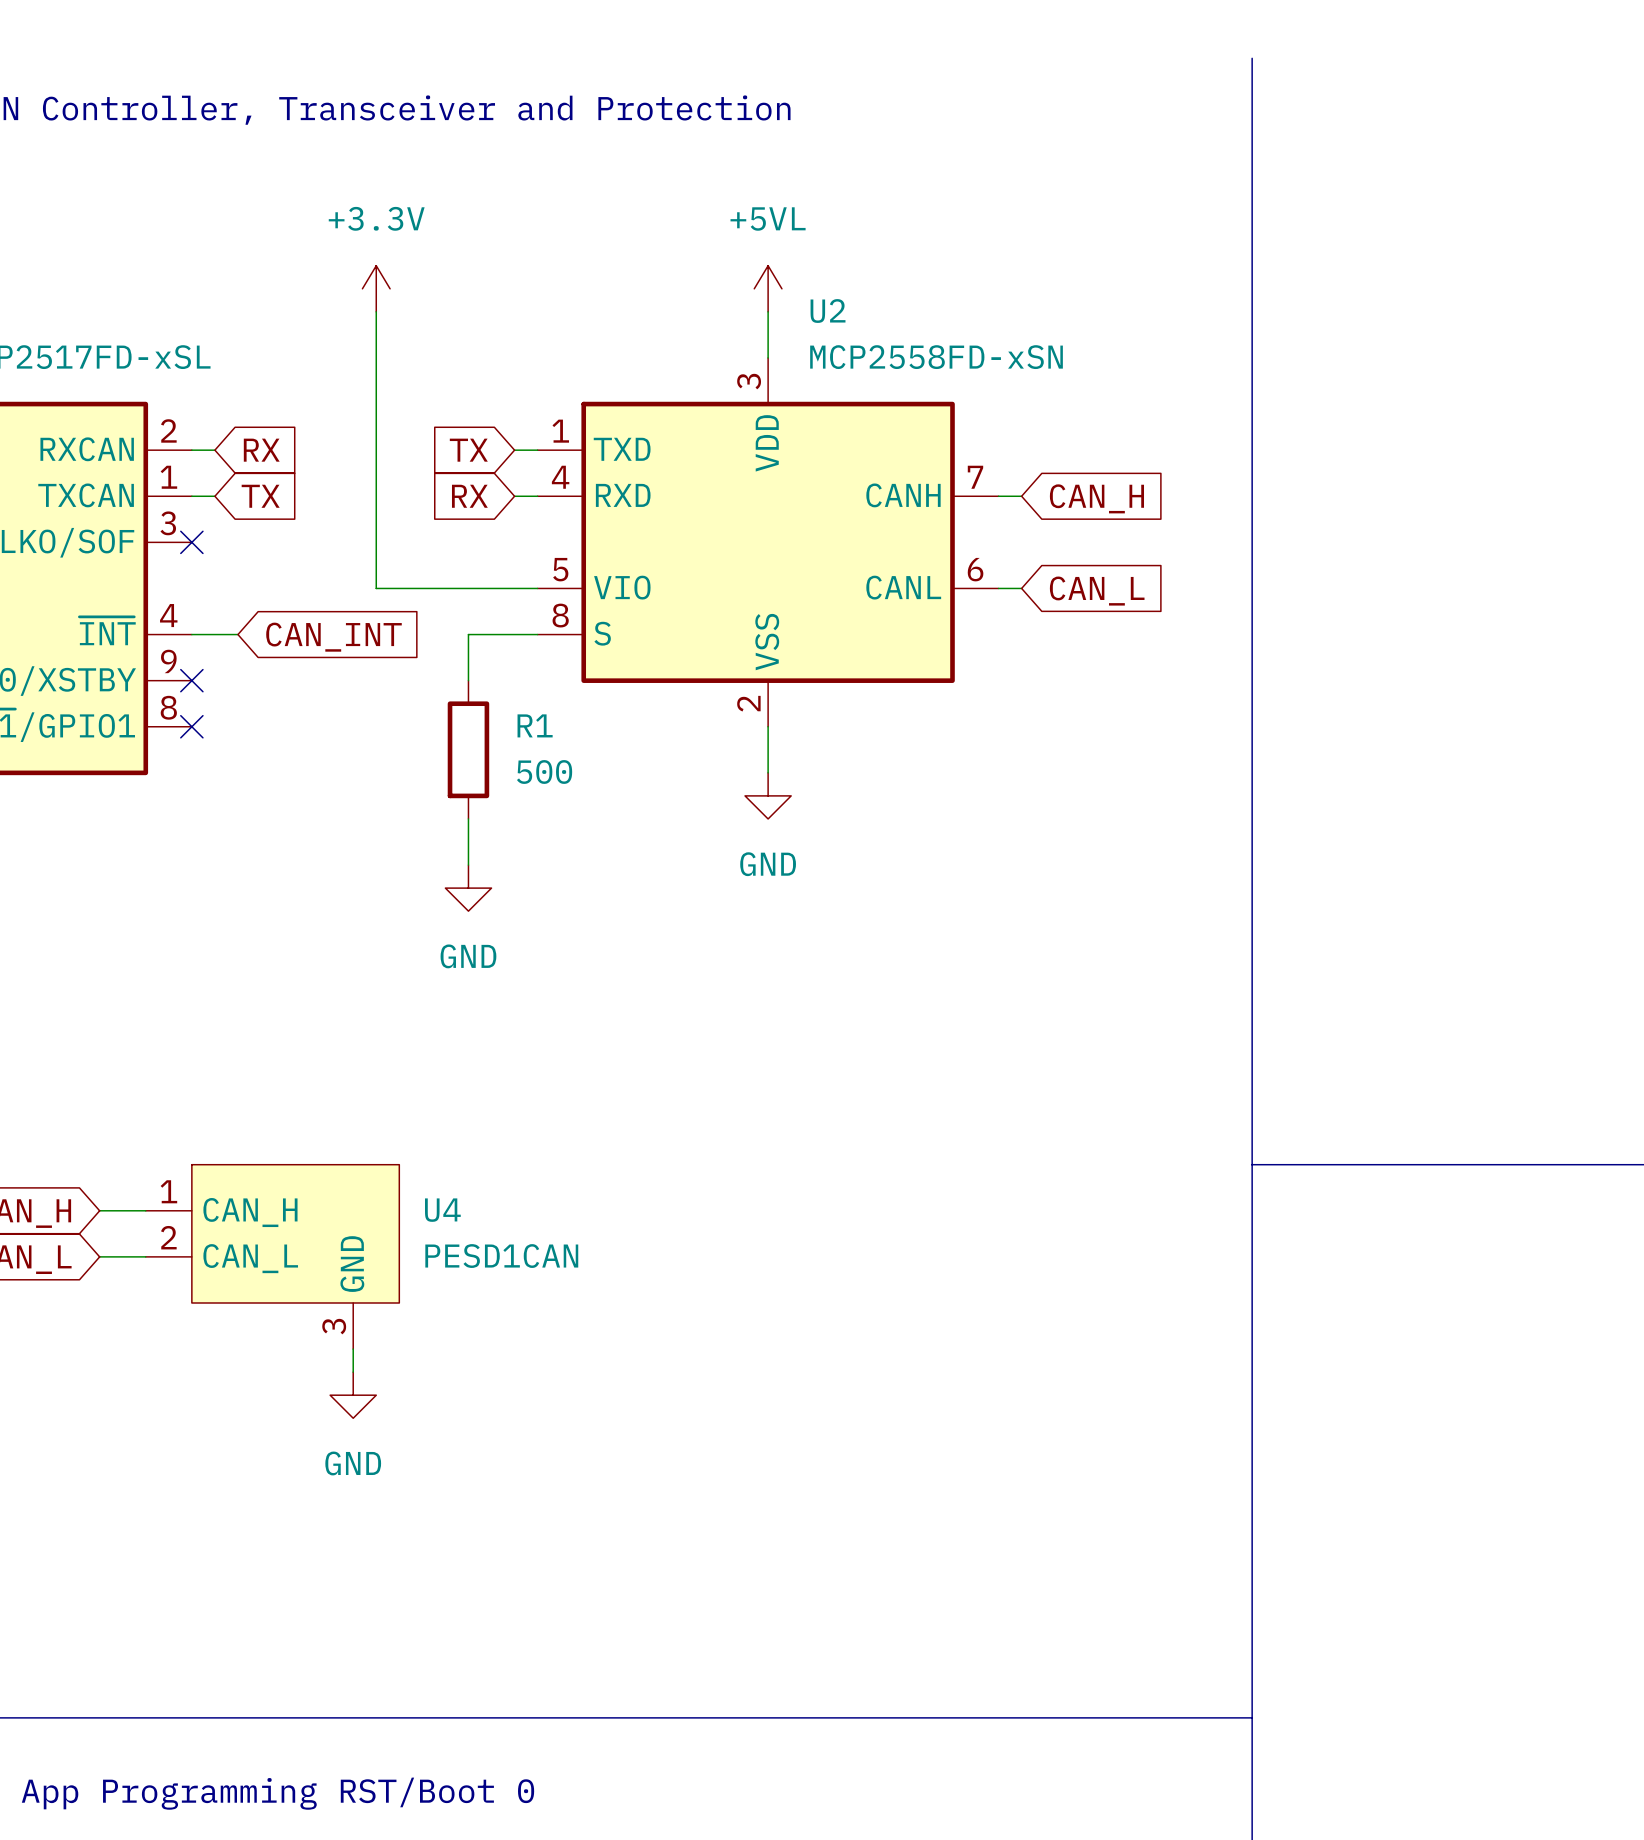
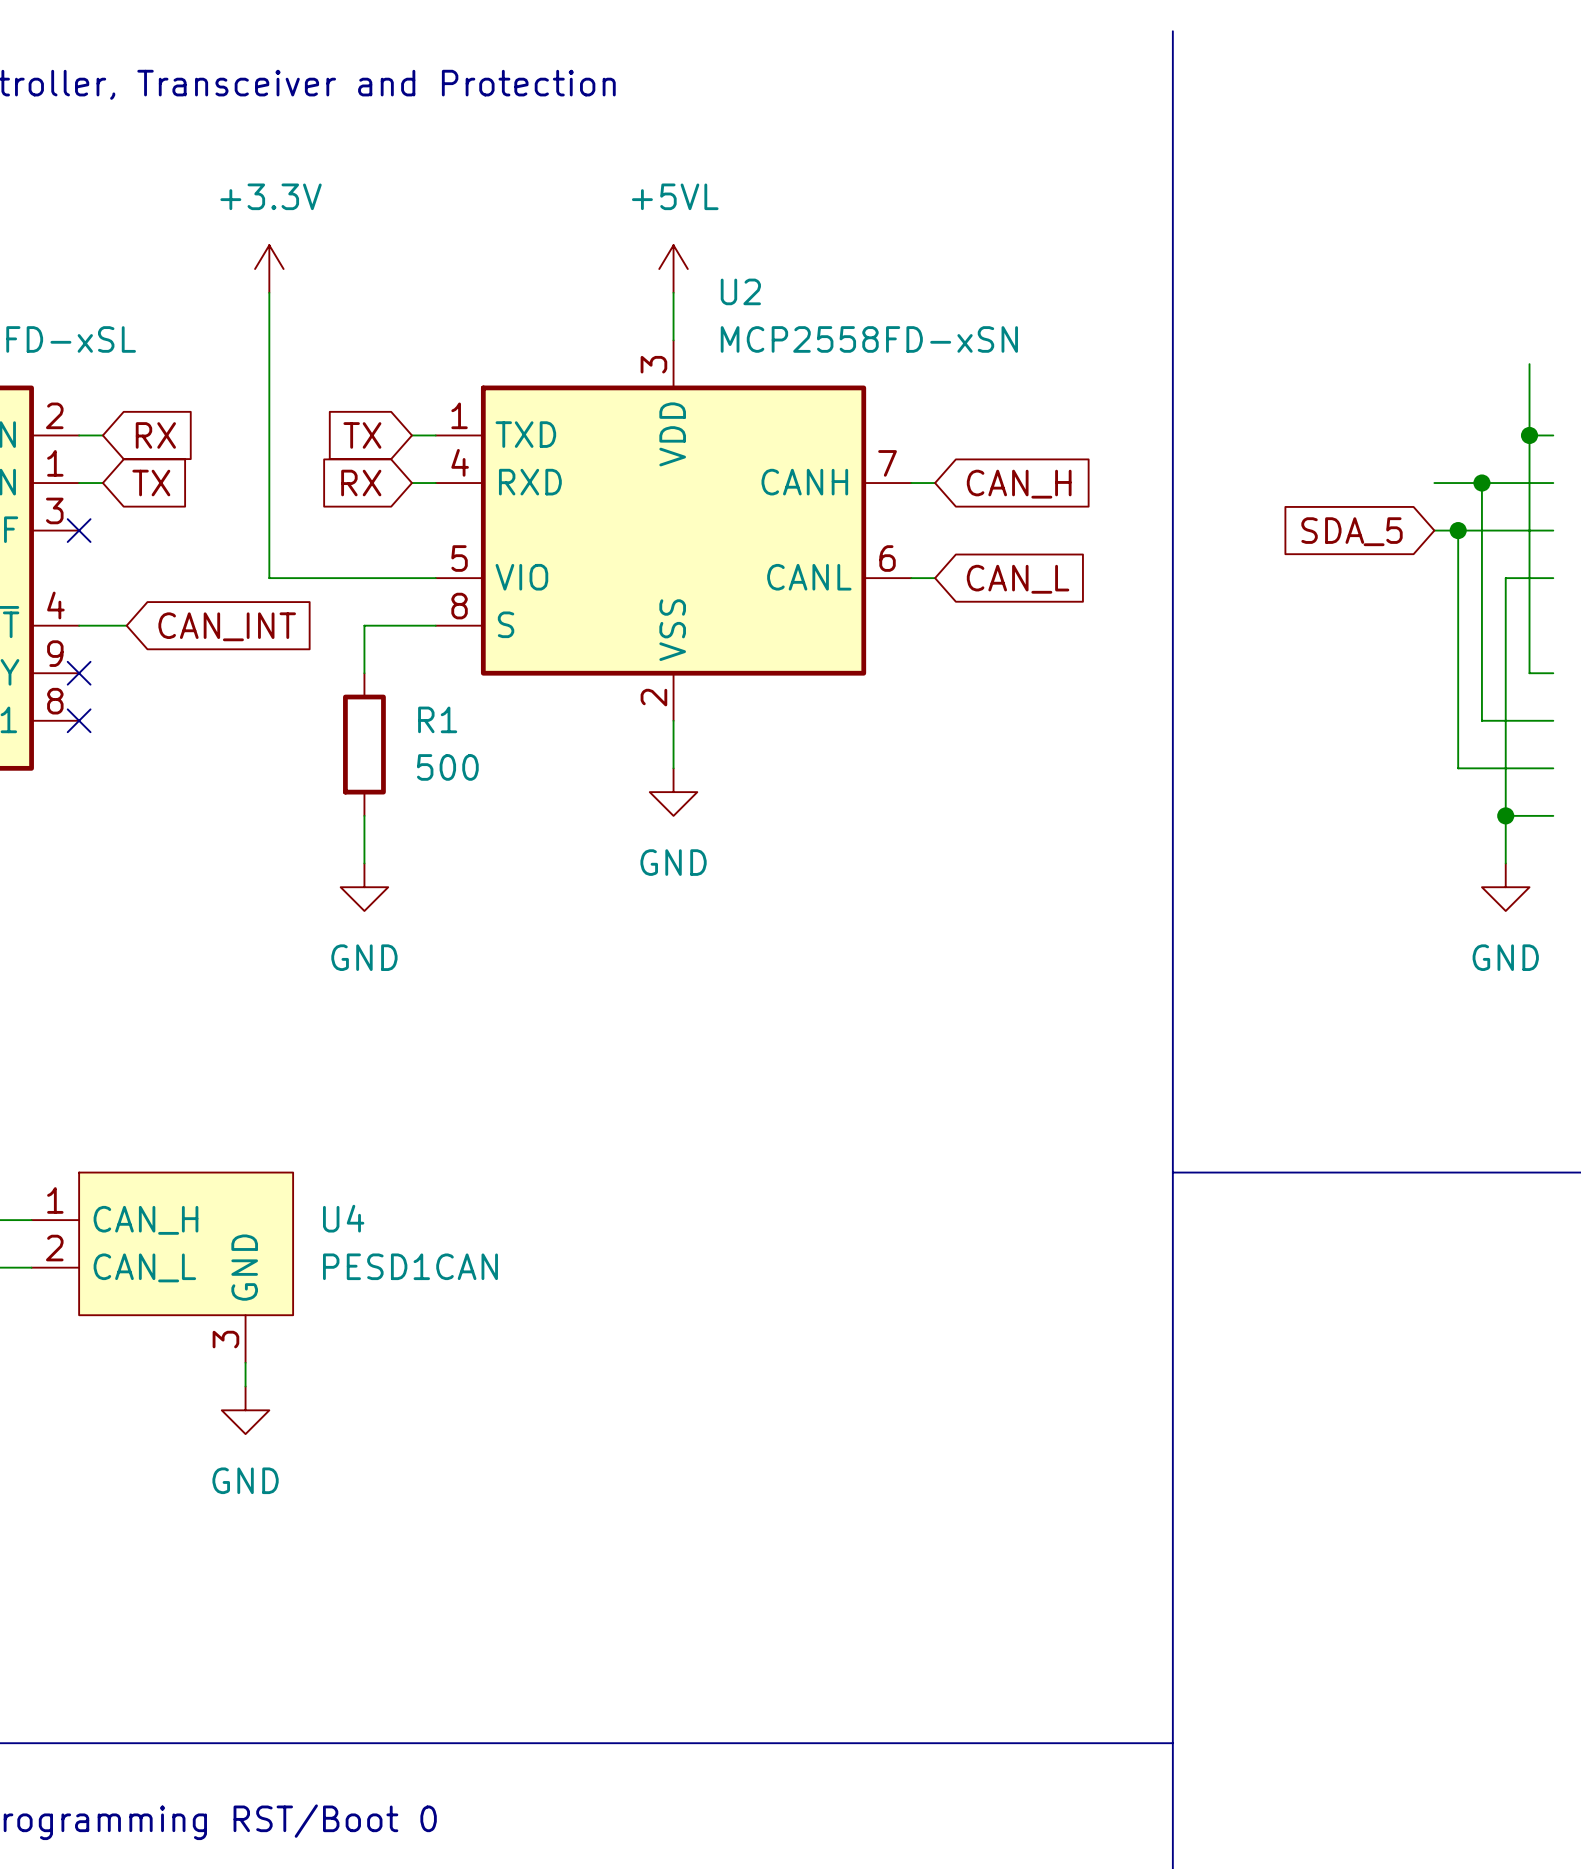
wire: none -> (1529, 364) (1529, 673) (1553, 673)
wire: none -> (1529, 435) (1553, 435)
junction: none -> (1529, 435)
wire: none -> (1434, 483) (1553, 483)
wire: none -> (1481, 483) (1481, 720) (1553, 720)
junction: none -> (1481, 483)
wire: none -> (1434, 530) (1553, 530)
wire: none -> (1458, 530) (1458, 768) (1553, 768)
junction: none -> (1458, 530)
global label: none -> SDA_5 (1352, 531)
wire: none -> (1553, 578) (1505, 578) (1505, 863)
wire: none -> (1505, 815) (1553, 815)
junction: none -> (1505, 815)
power symbol: none -> GND (1505, 887)

